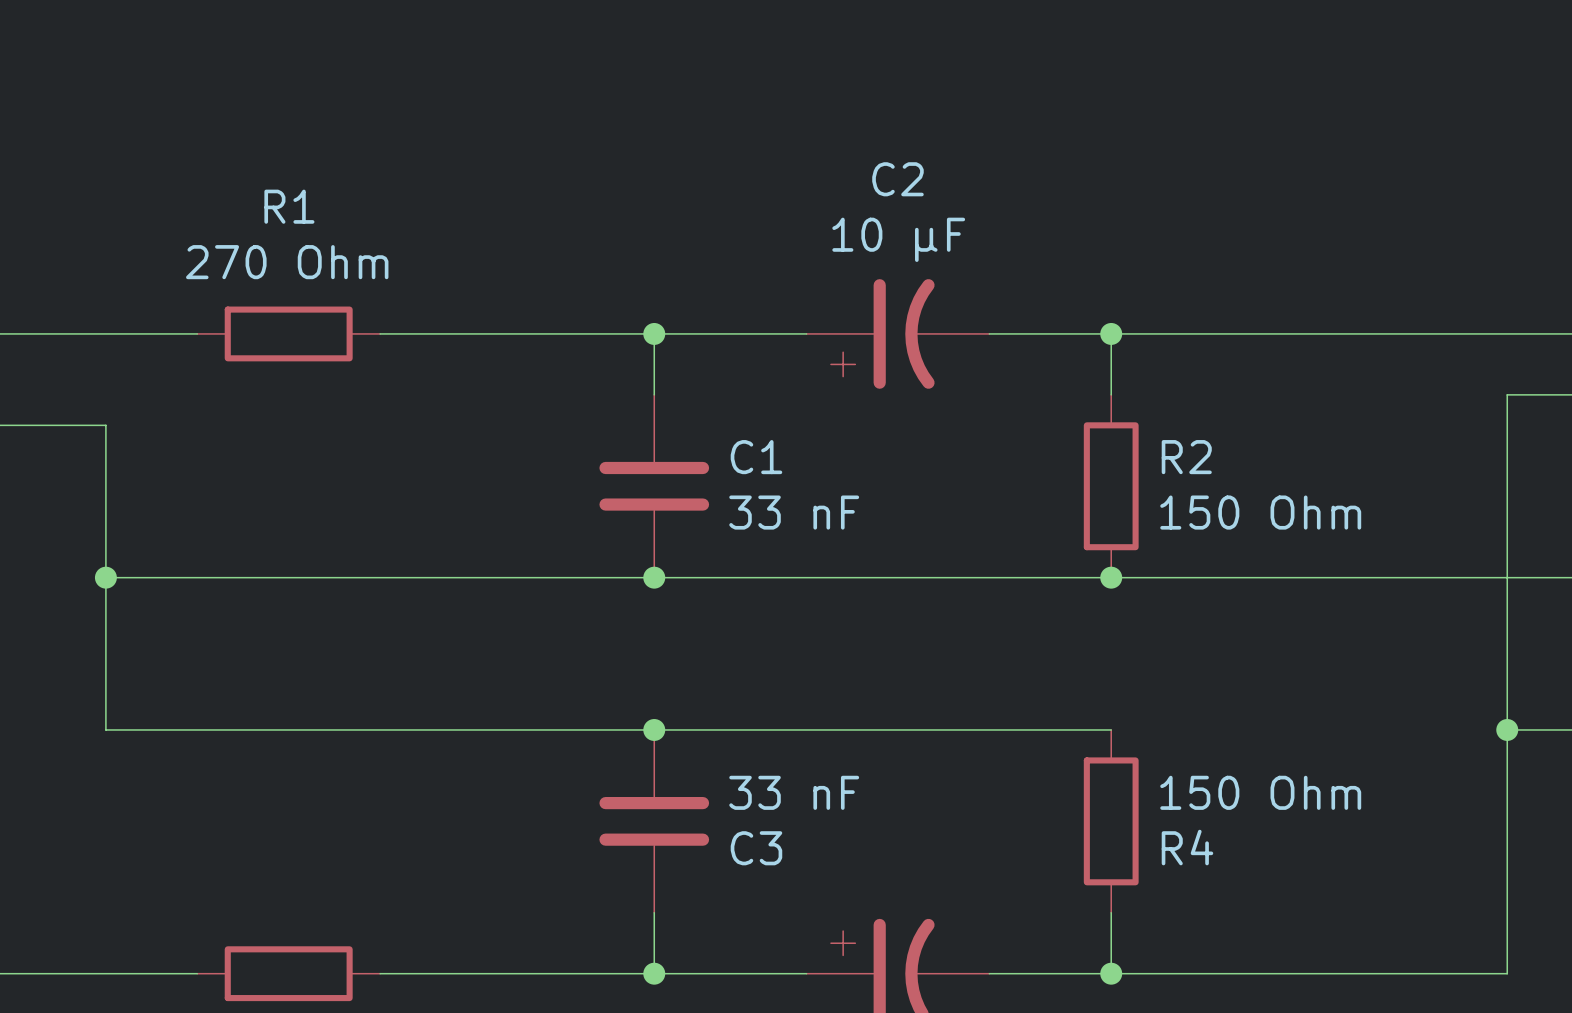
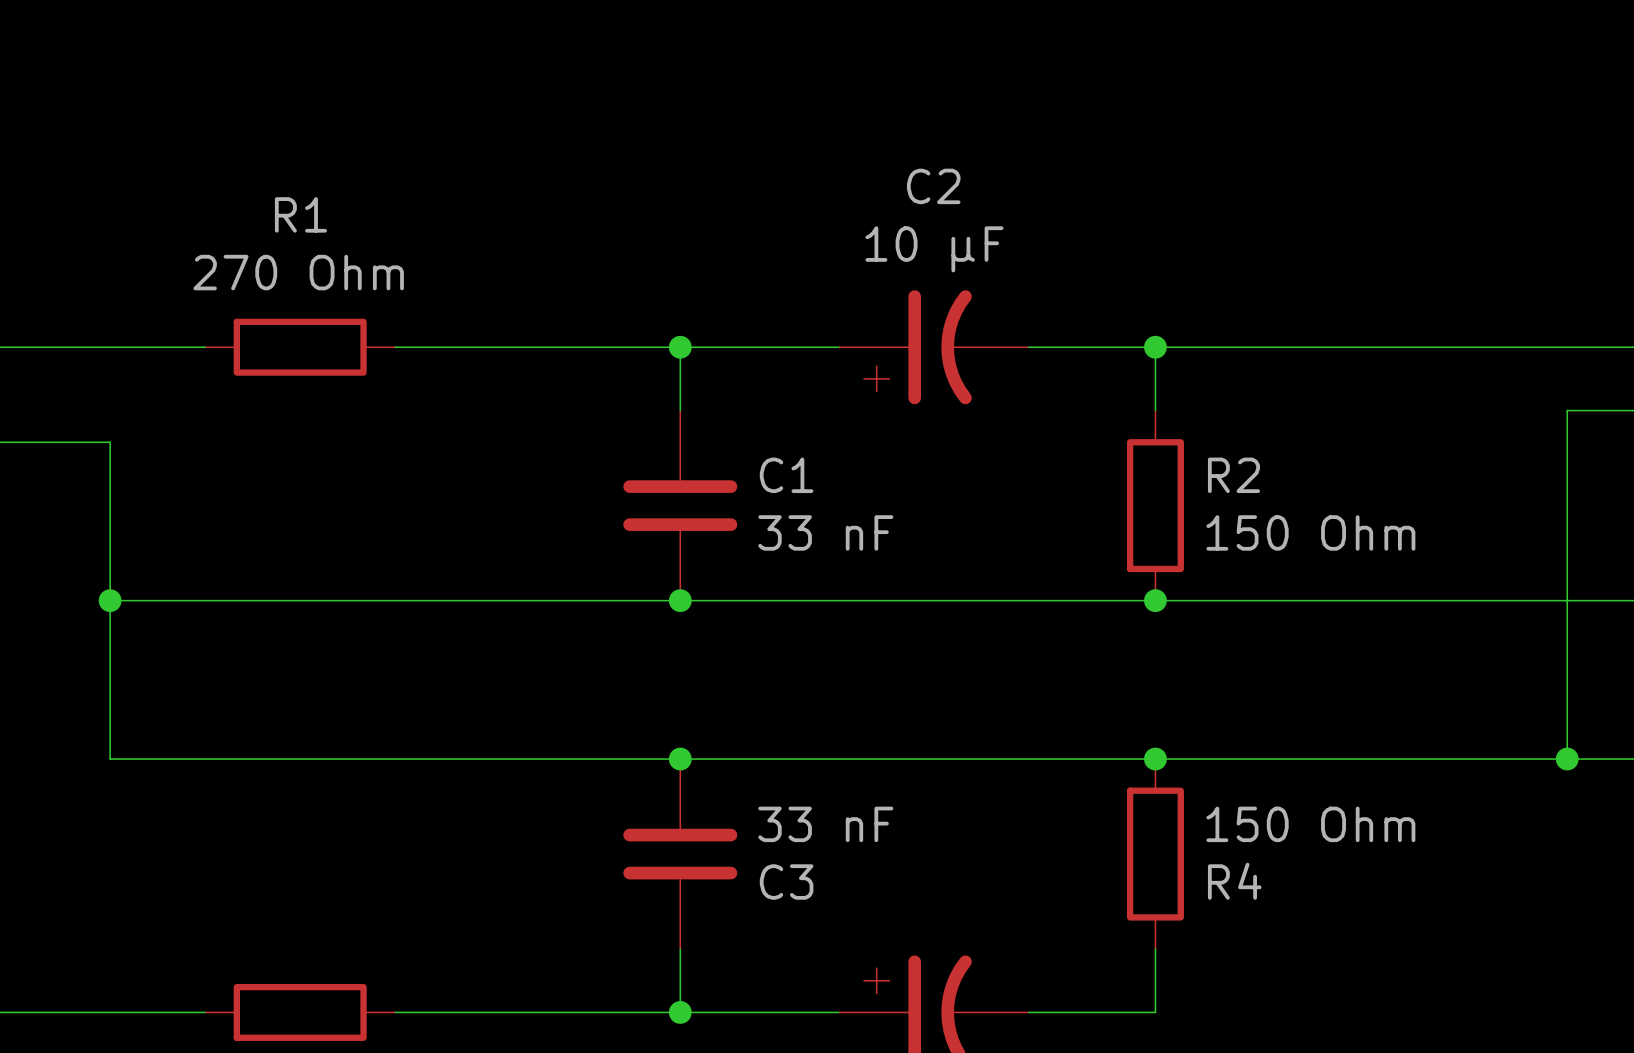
junction: none -> (1155, 759)
wire: (1507, 729) (1507, 973) (1111, 973) -> (1567, 759) (1155, 759)
junction: (1111, 973) -> none

